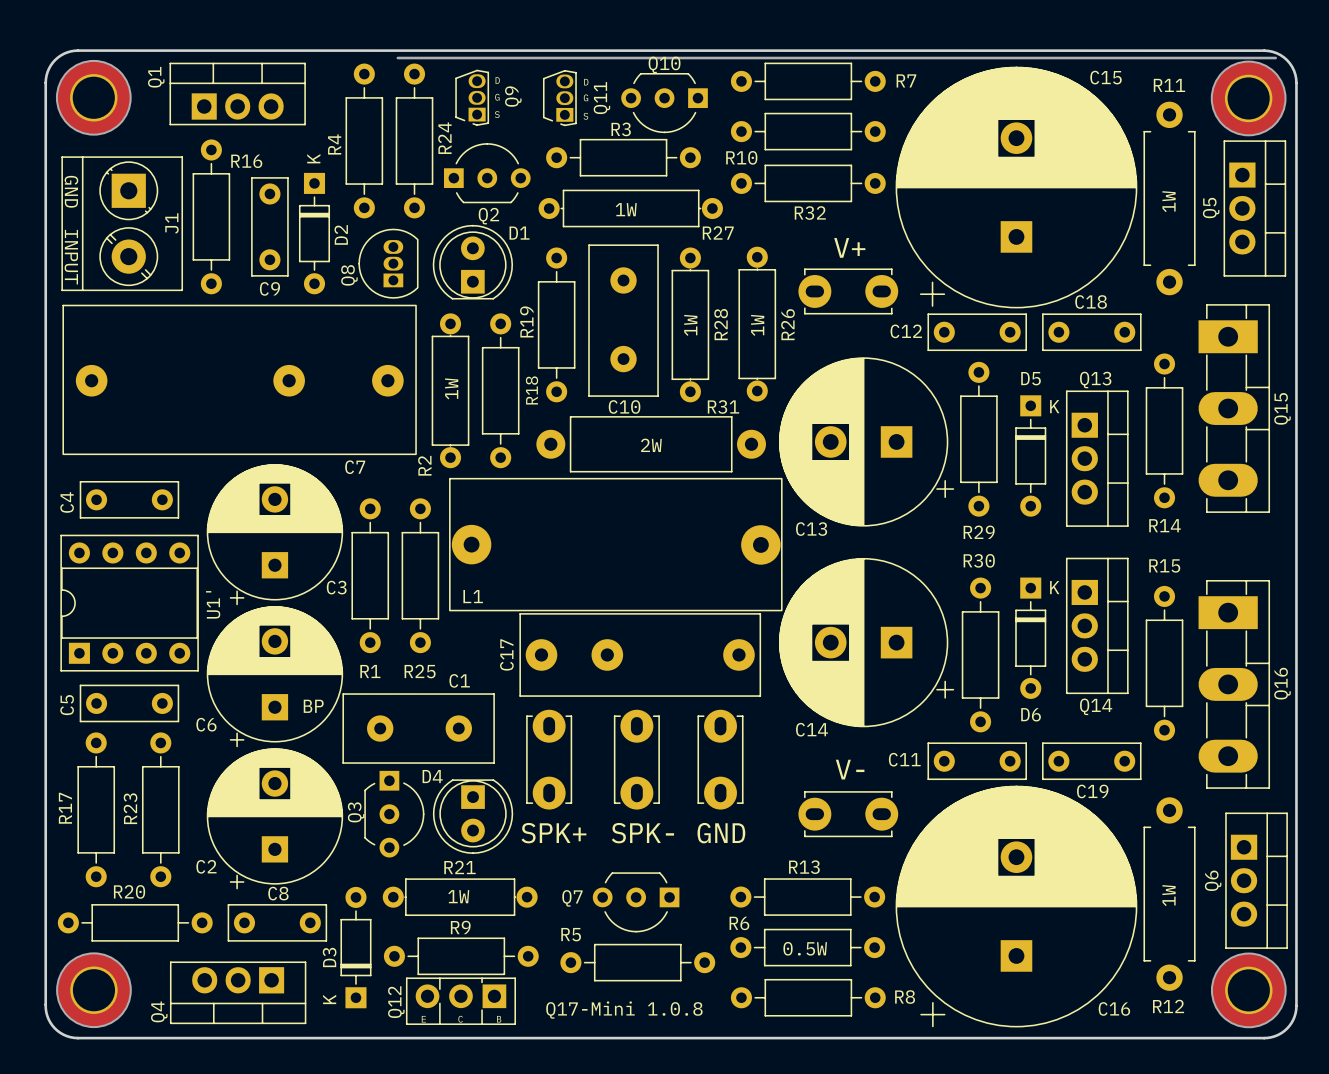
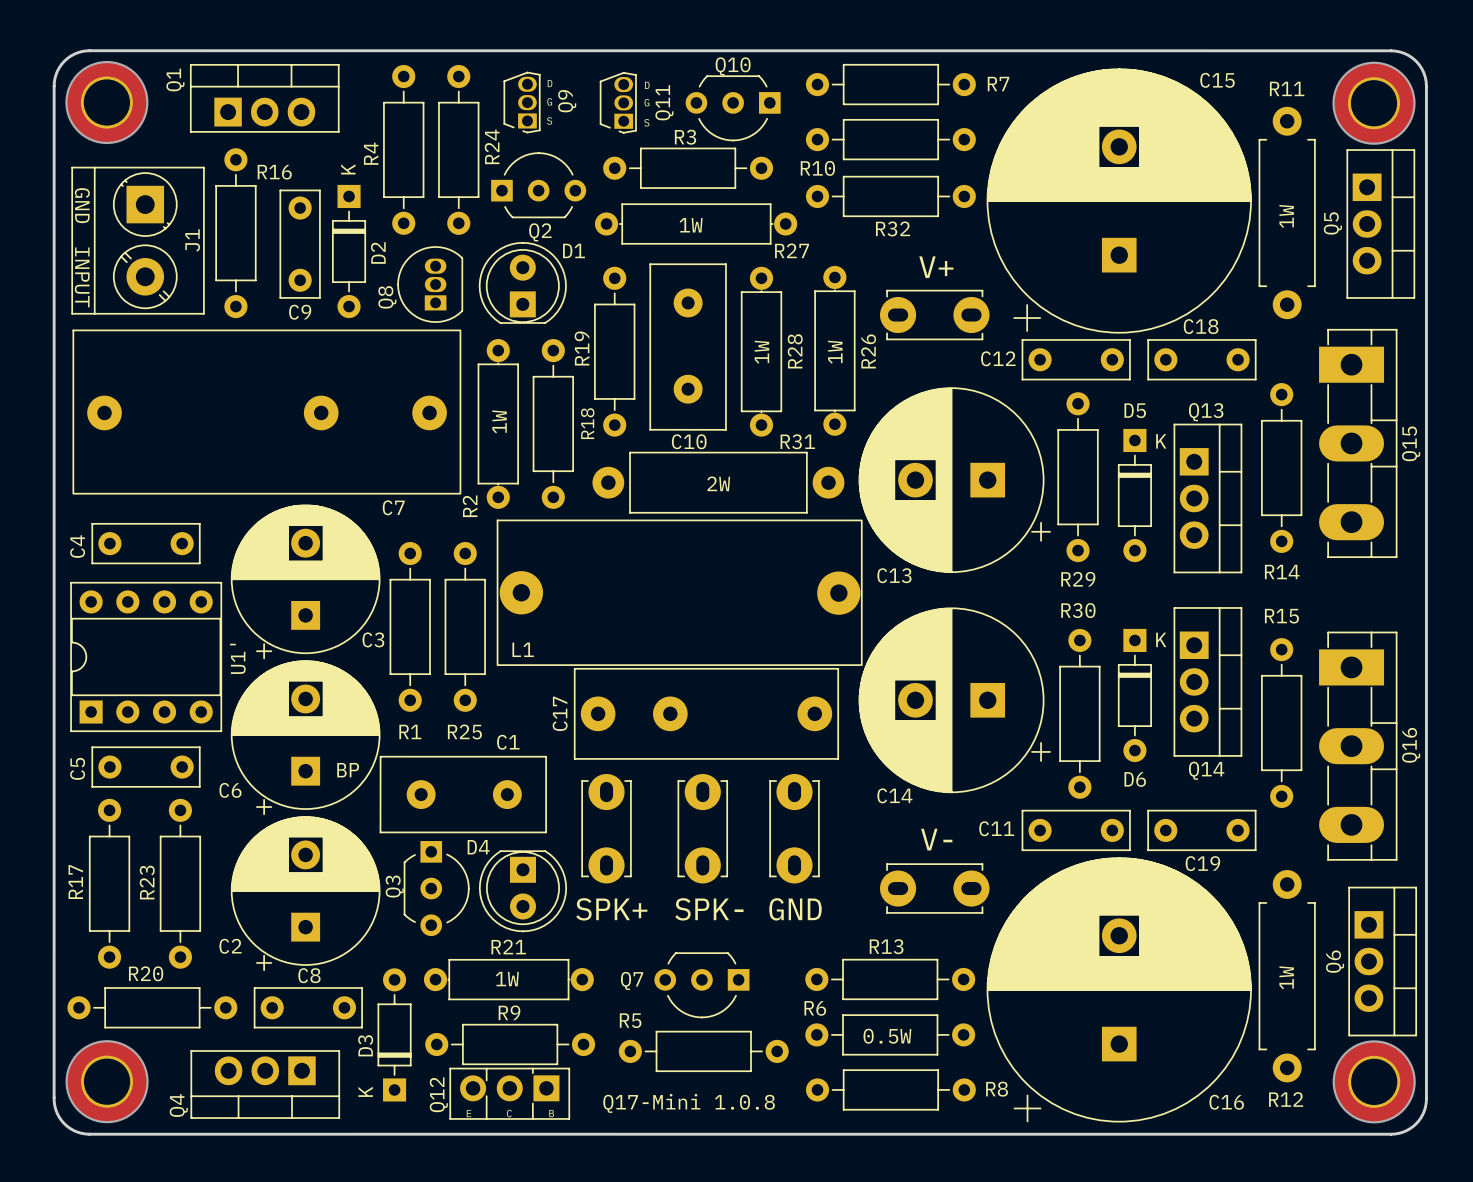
line: (397, 58) (1275, 58) -> none

